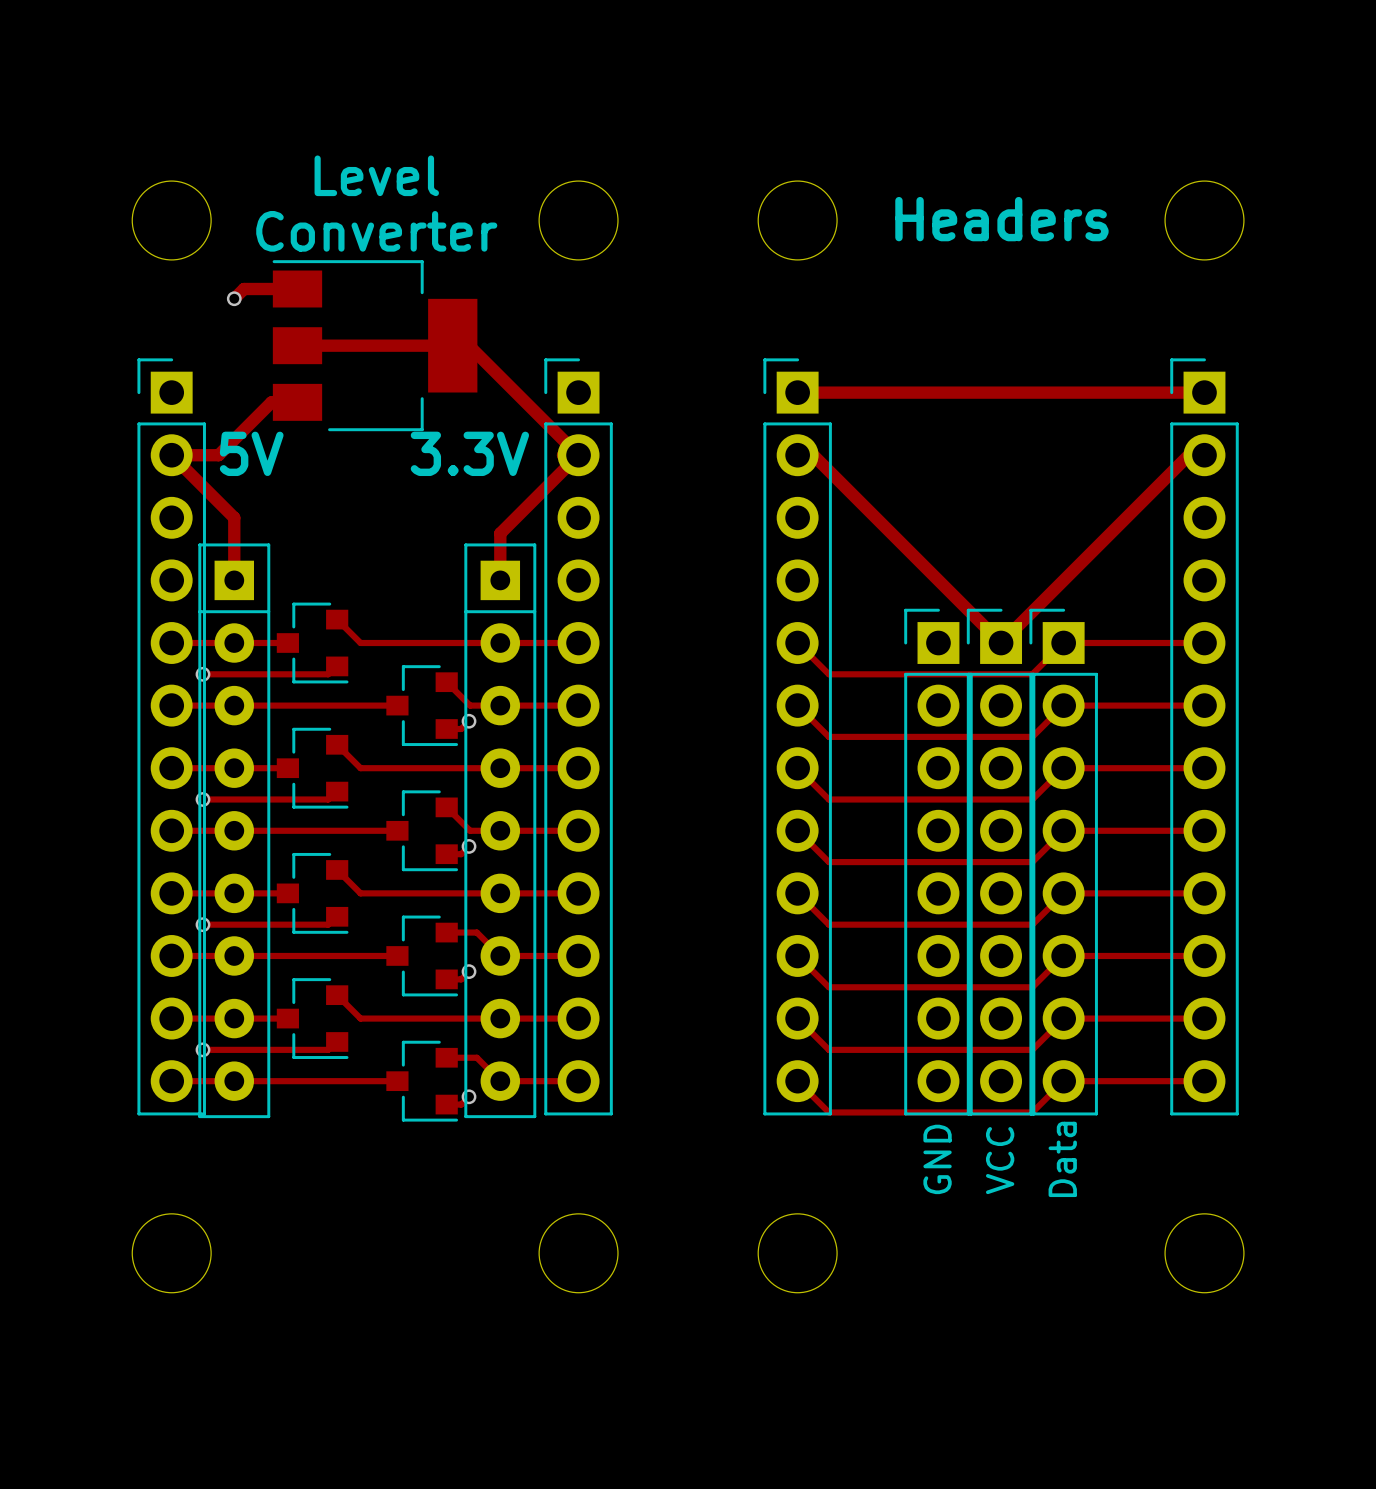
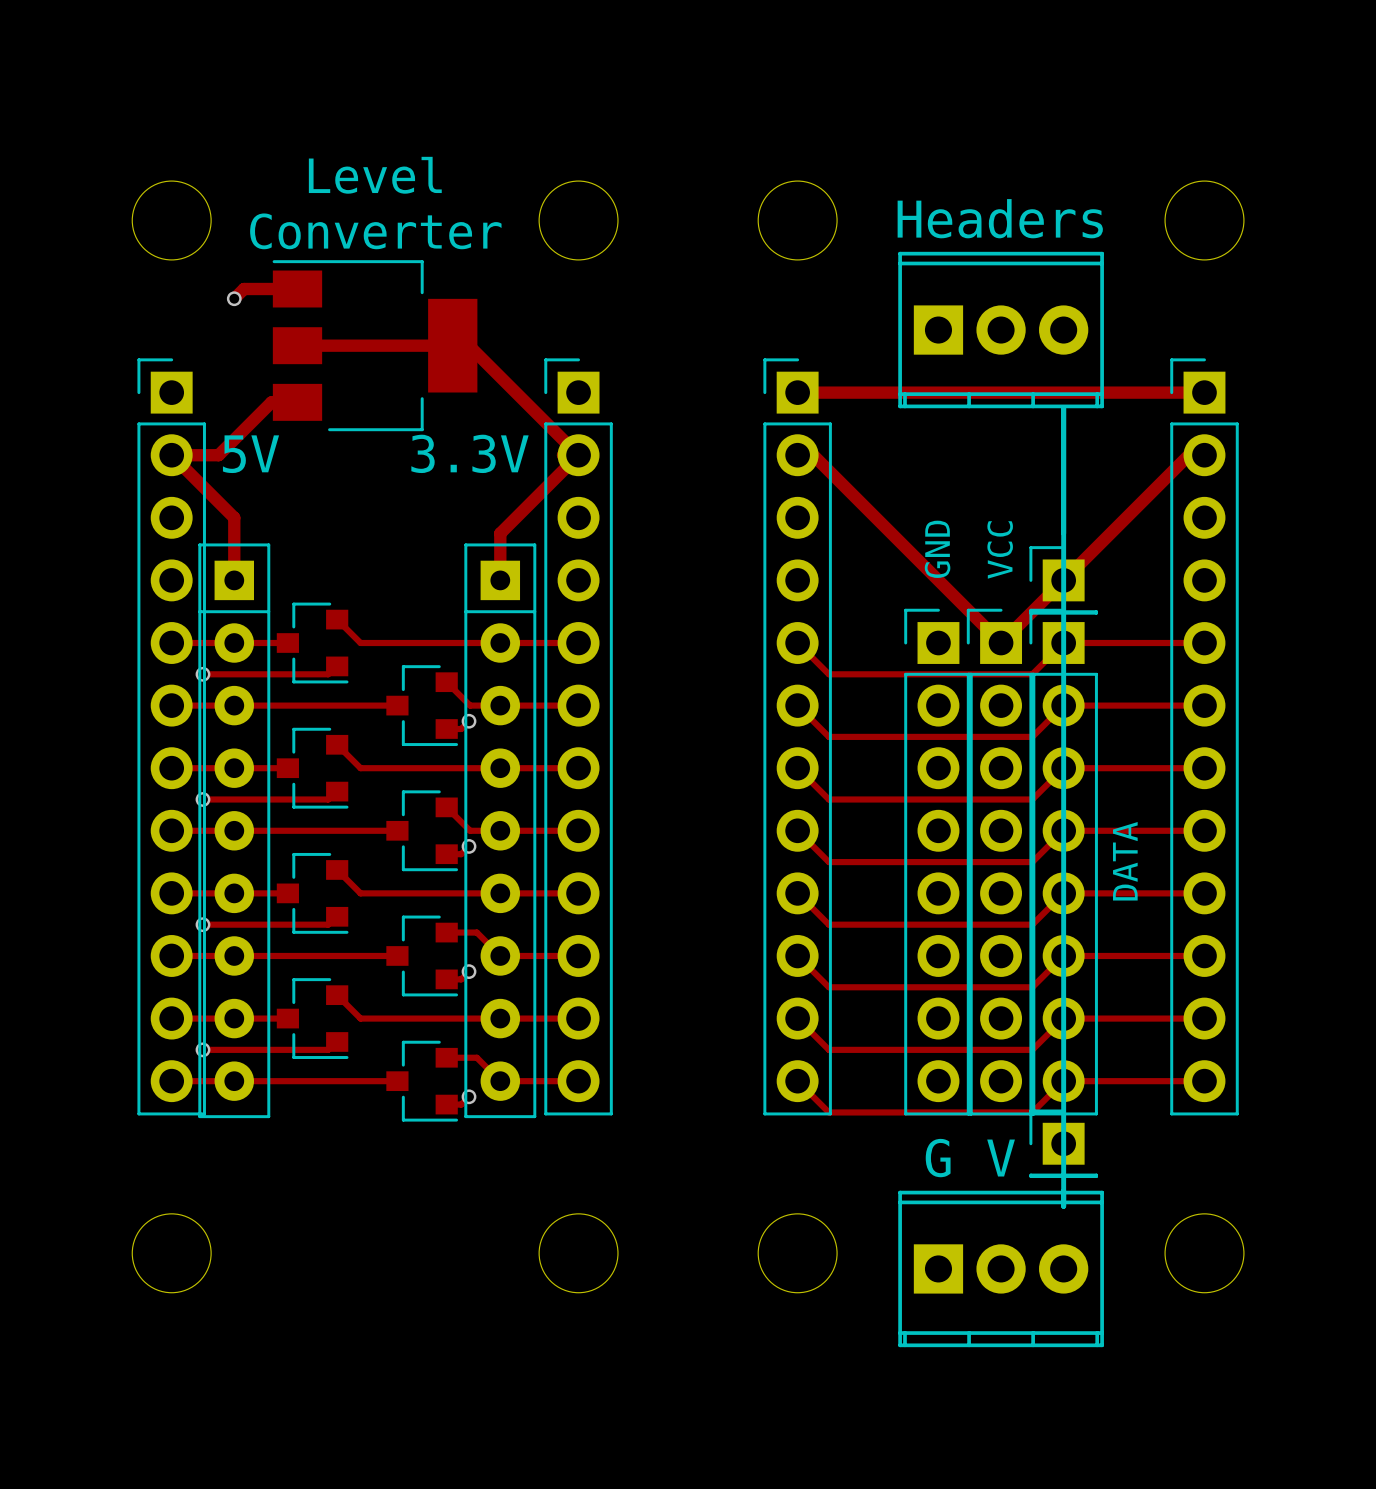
part: none -> (1001, 330)
line: none -> (1063, 408) (1063, 1206)
part: none -> (1063, 580)
part: none -> (1063, 1143)
text: none -> G (938, 1158)
text: none -> V (1001, 1158)
part value position: GND (937, 1159) -> GND (937, 549)
part value: Data (1062, 1159) -> DATA (1125, 861)
part value position: VCC (1000, 1160) -> VCC (1000, 549)
part: none -> (1001, 1268)

